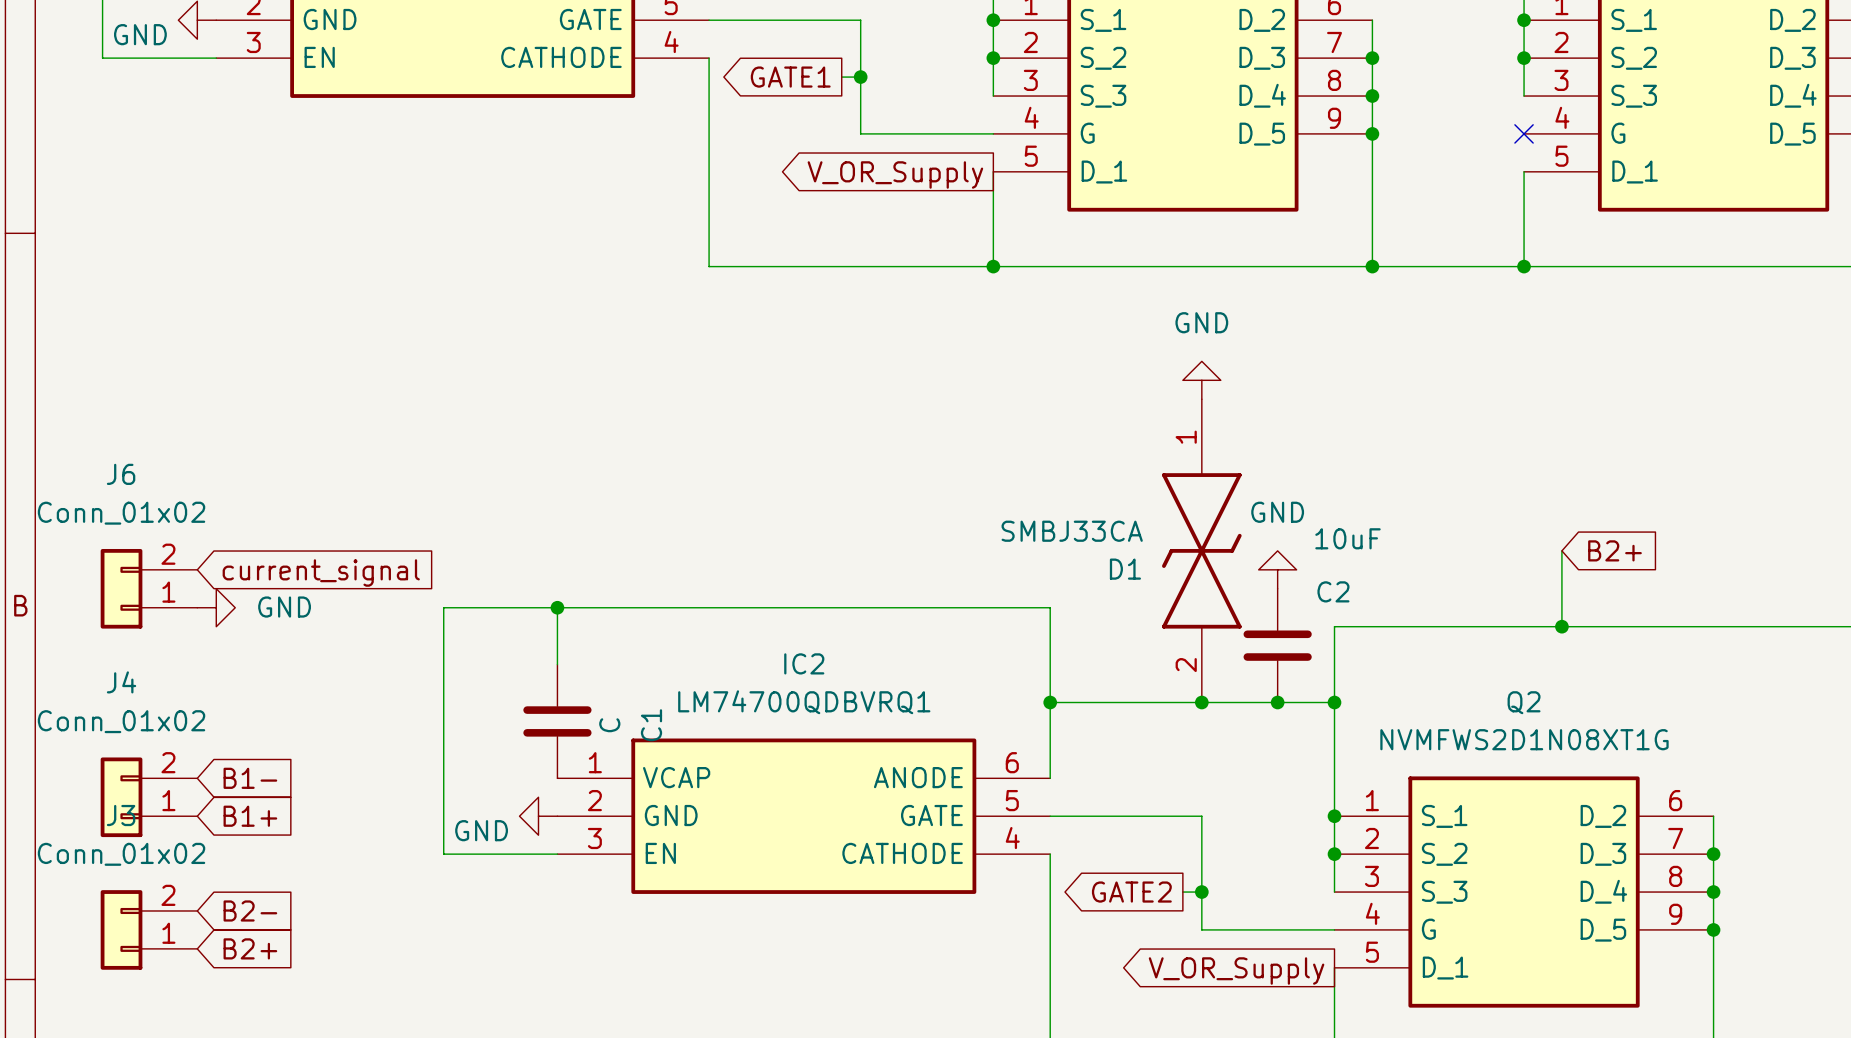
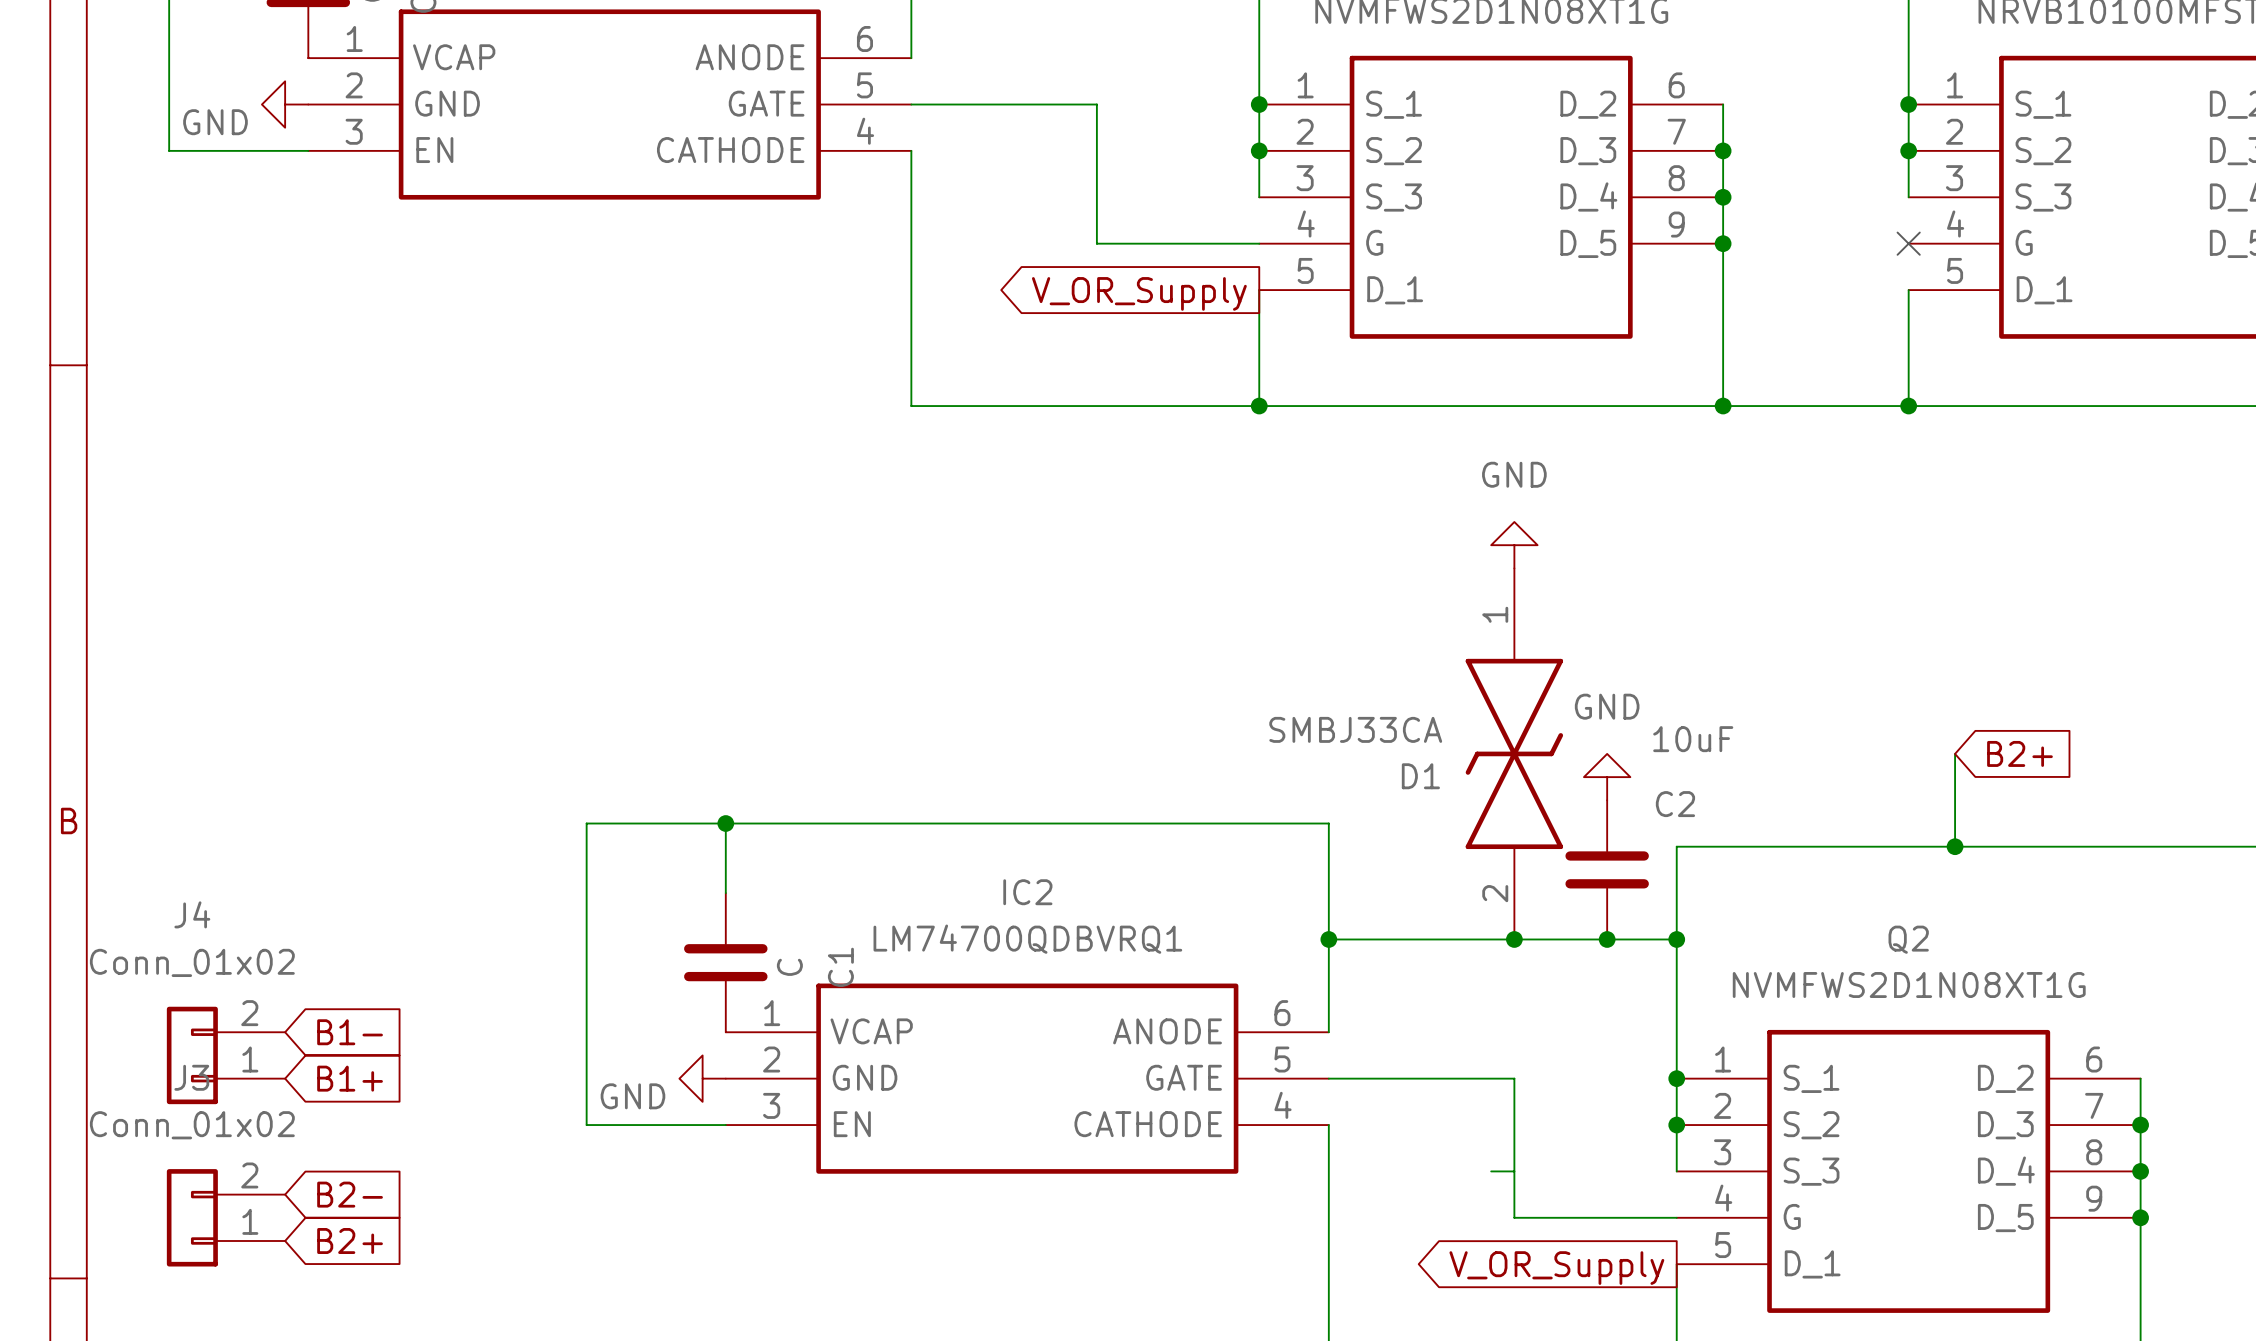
global label: GATE1 (790, 77) -> none
wire: (841, 77) (860, 77) -> none
junction: (860, 77) -> none
global label: current_signal (321, 572) -> none
J6: Conn_01x02 (149, 588) -> none
power symbol: GND (216, 607) -> none
global label: GATE2 (1131, 892) -> none
junction: (1201, 892) -> none

